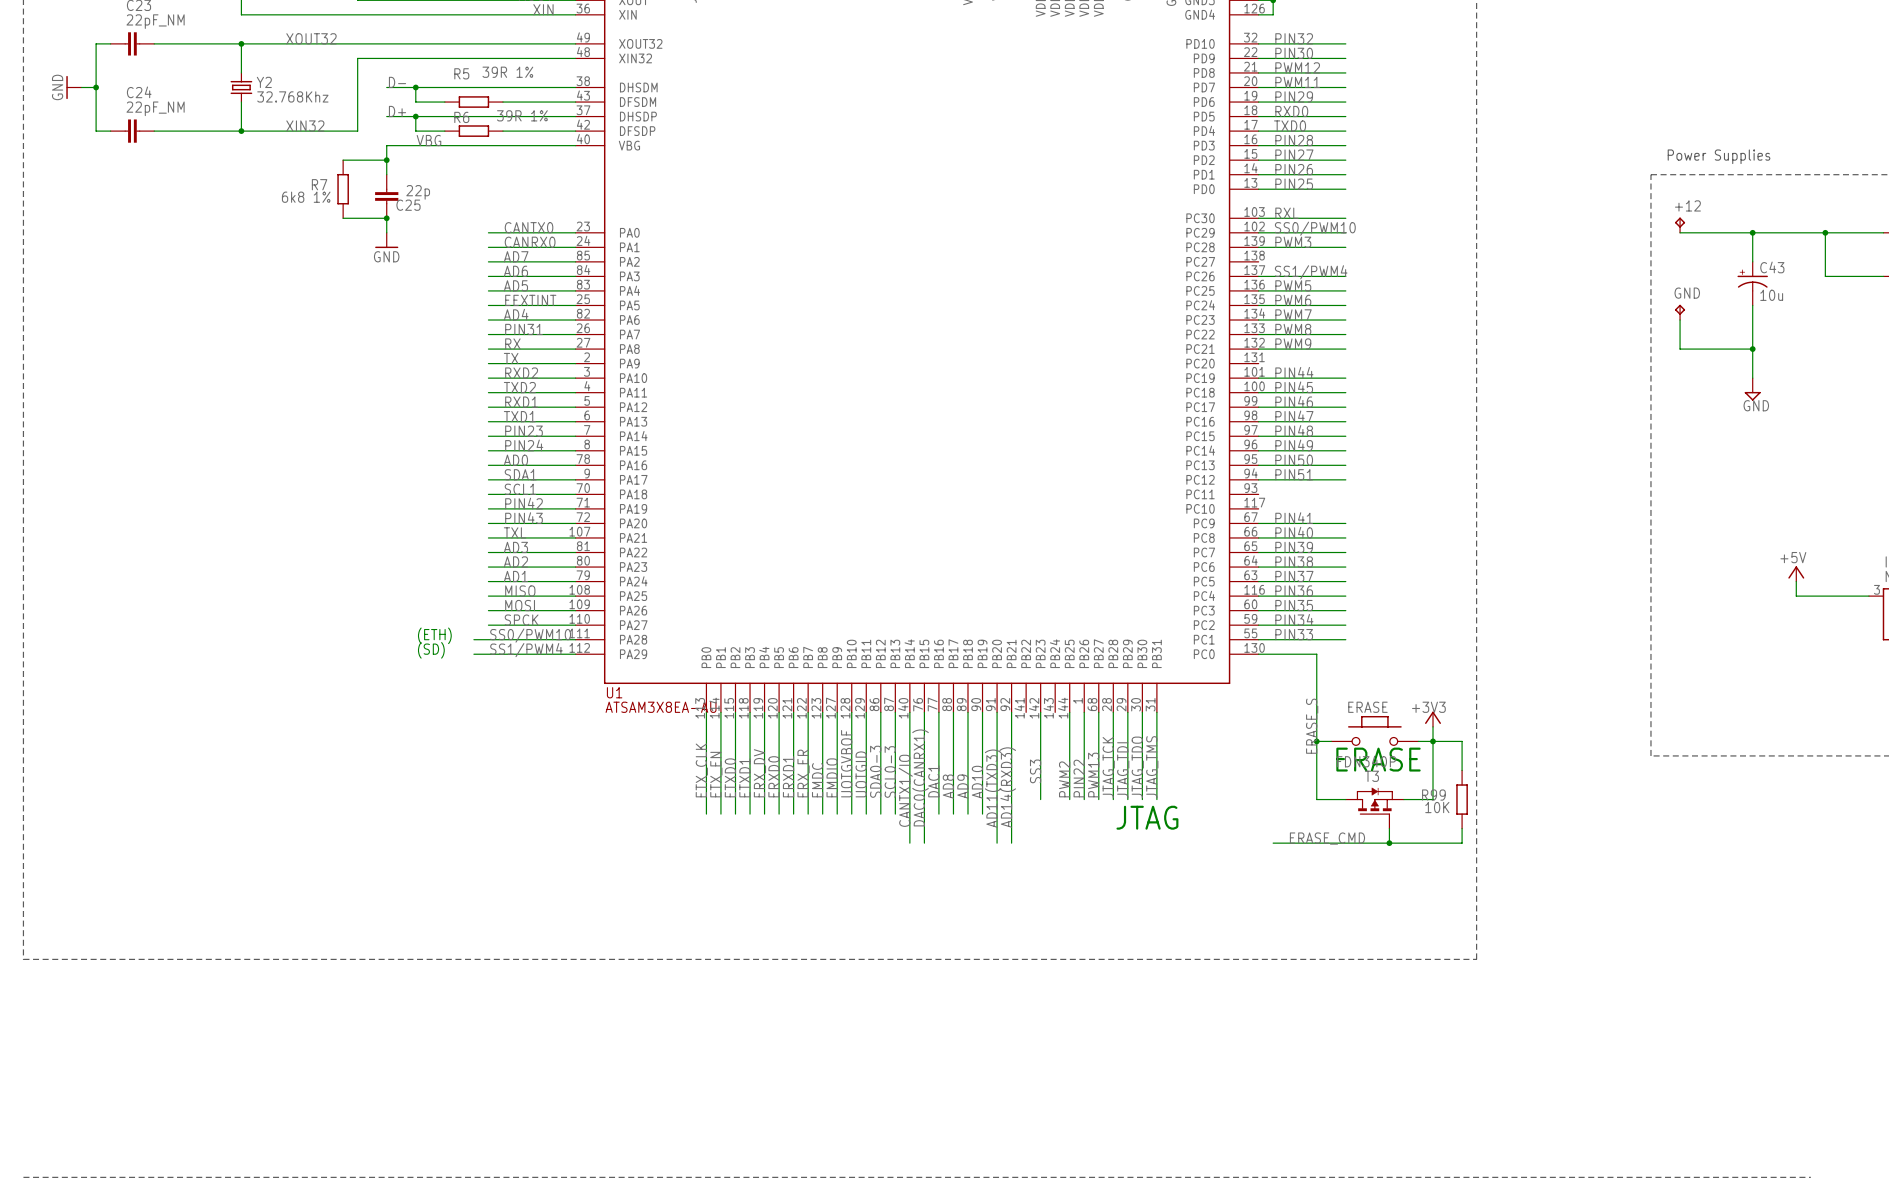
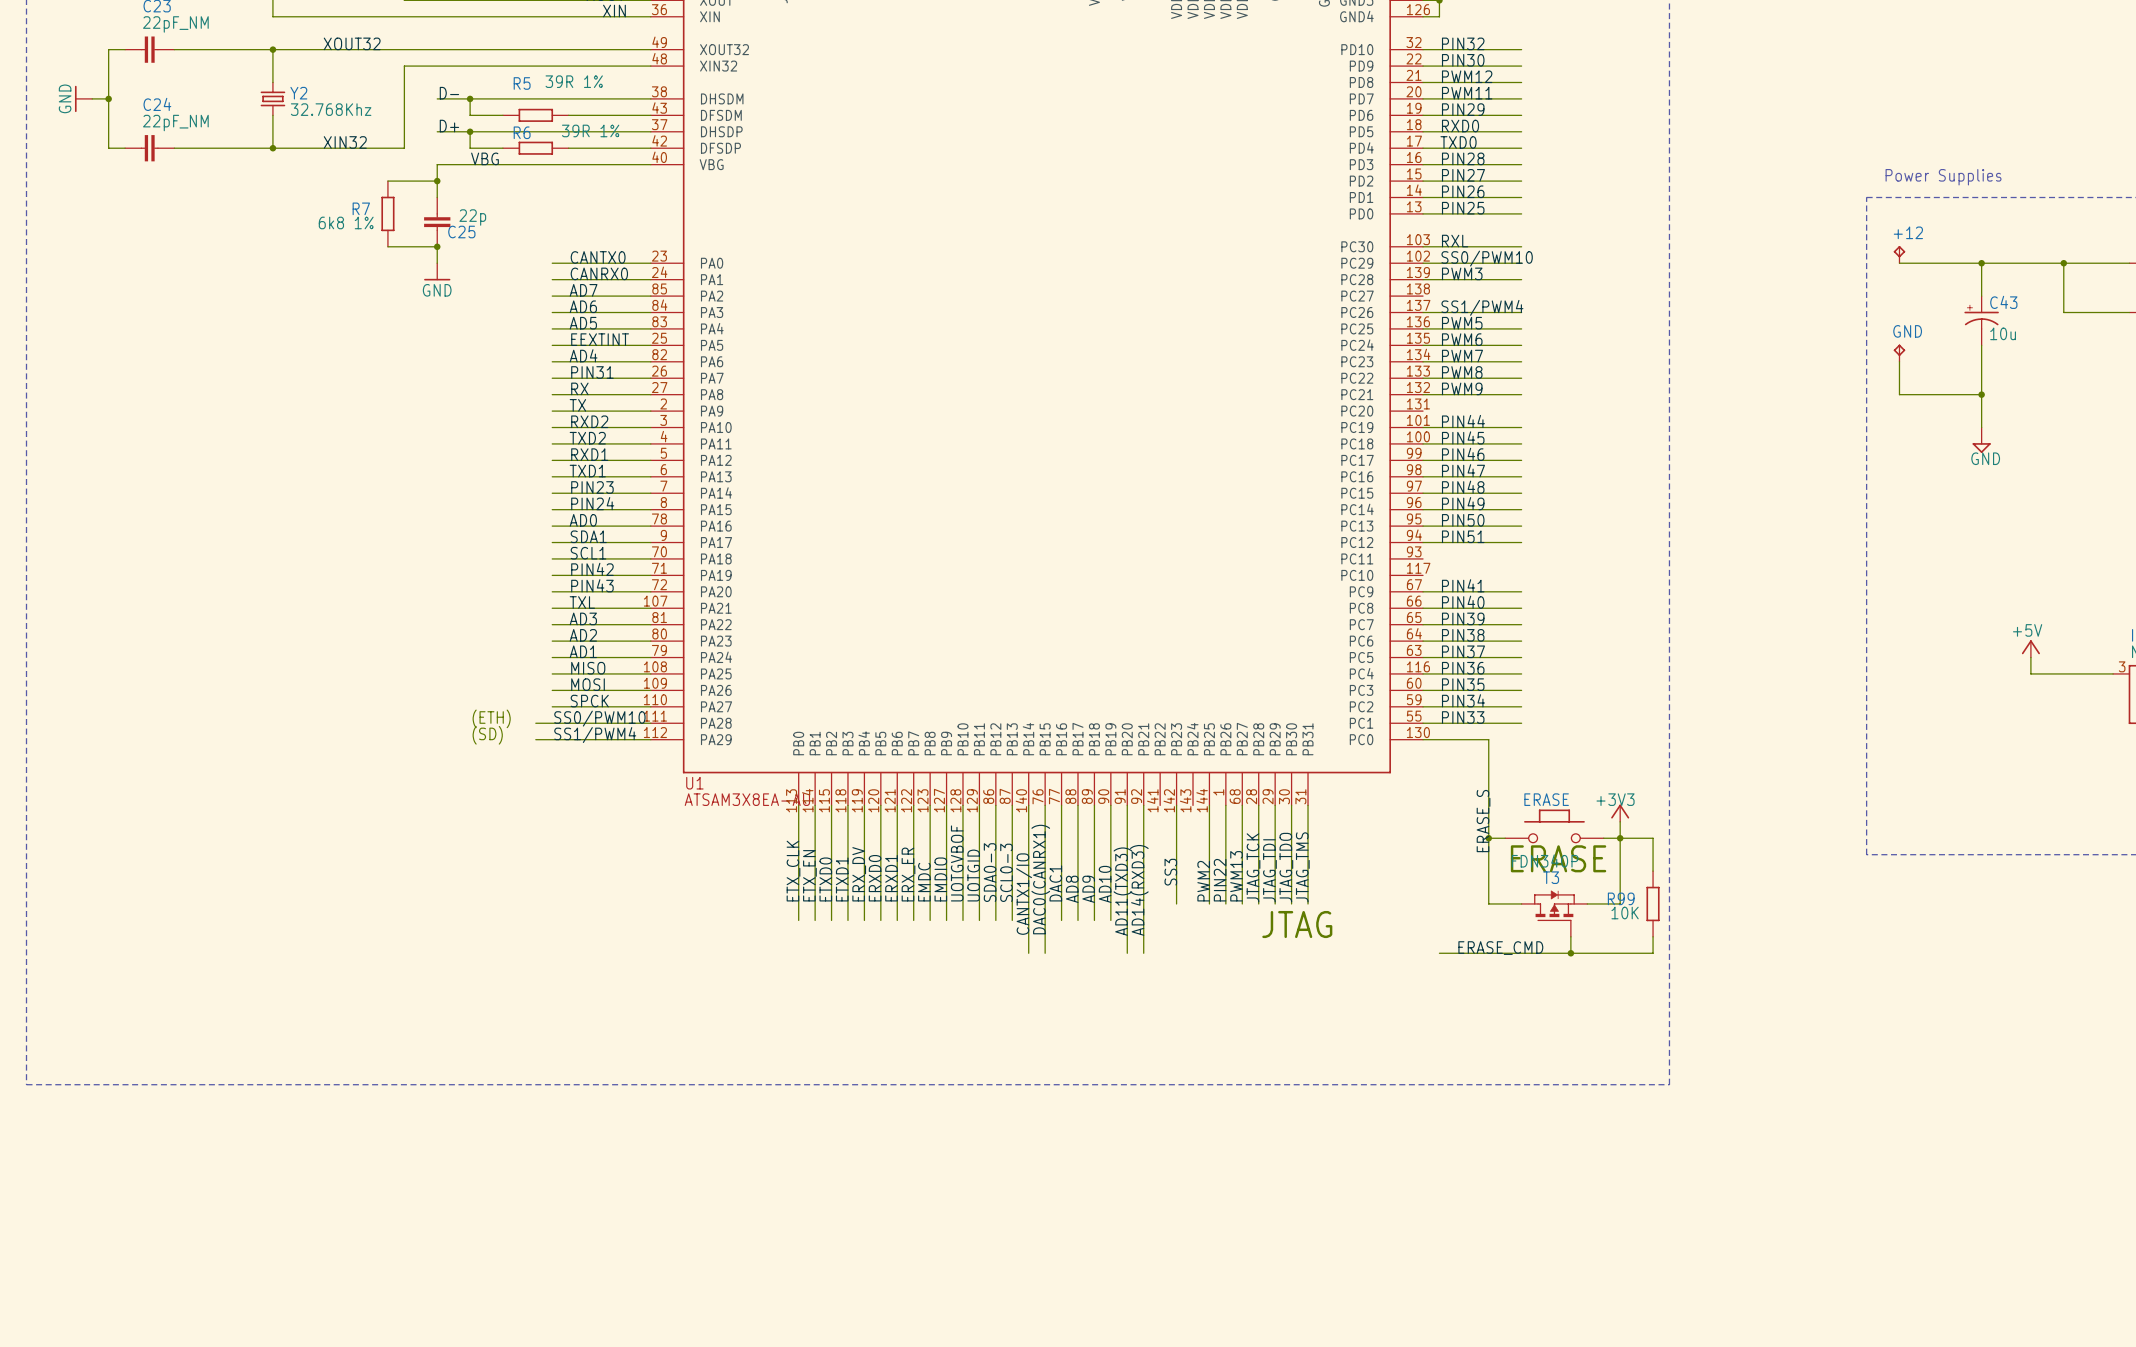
line: (23, 1177) (1810, 1177) -> none

